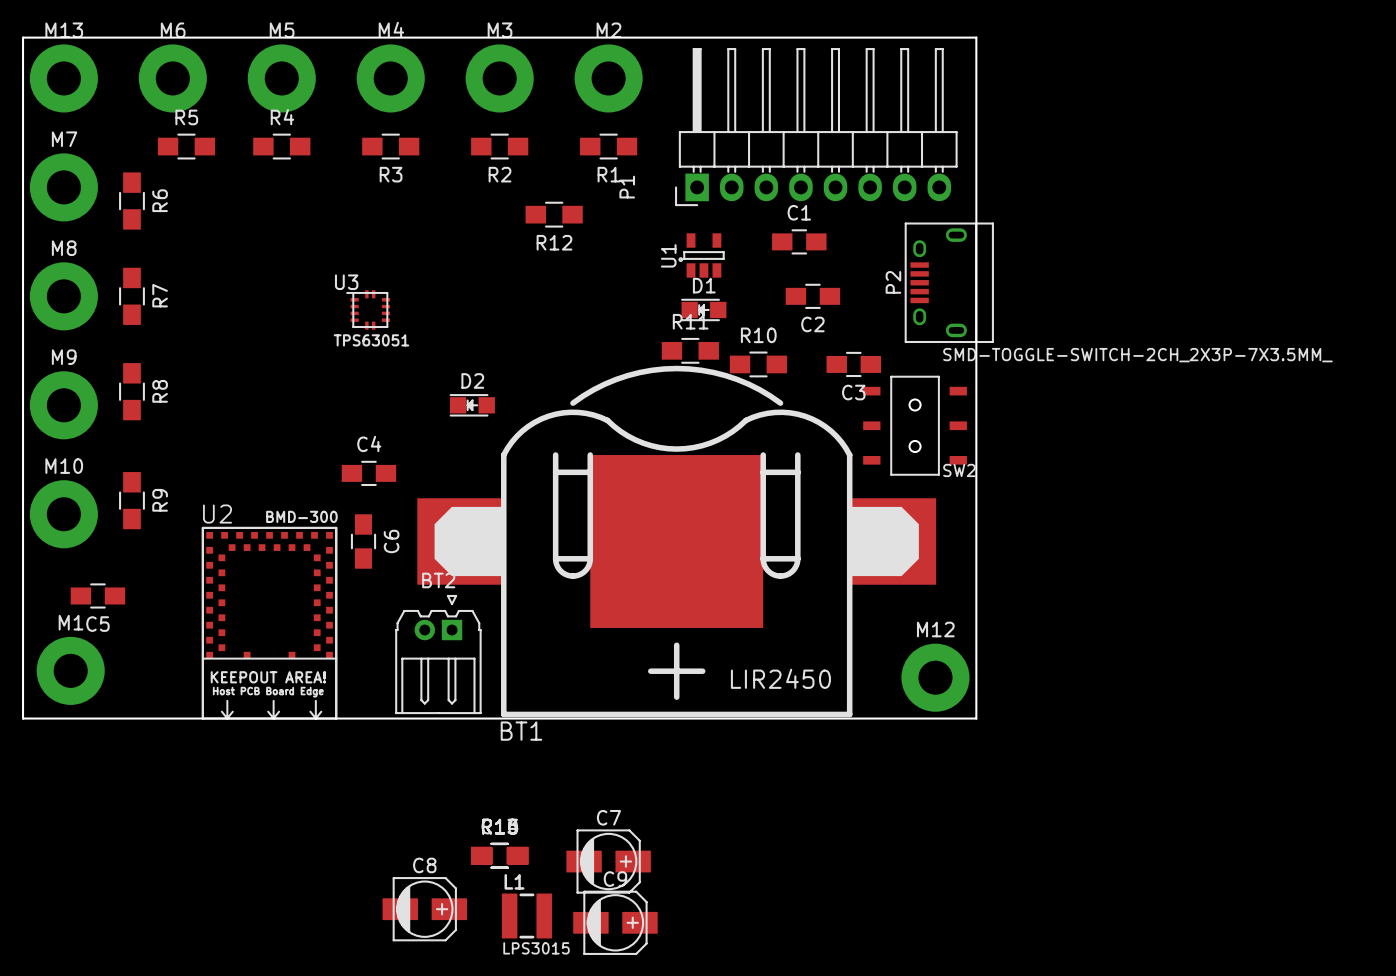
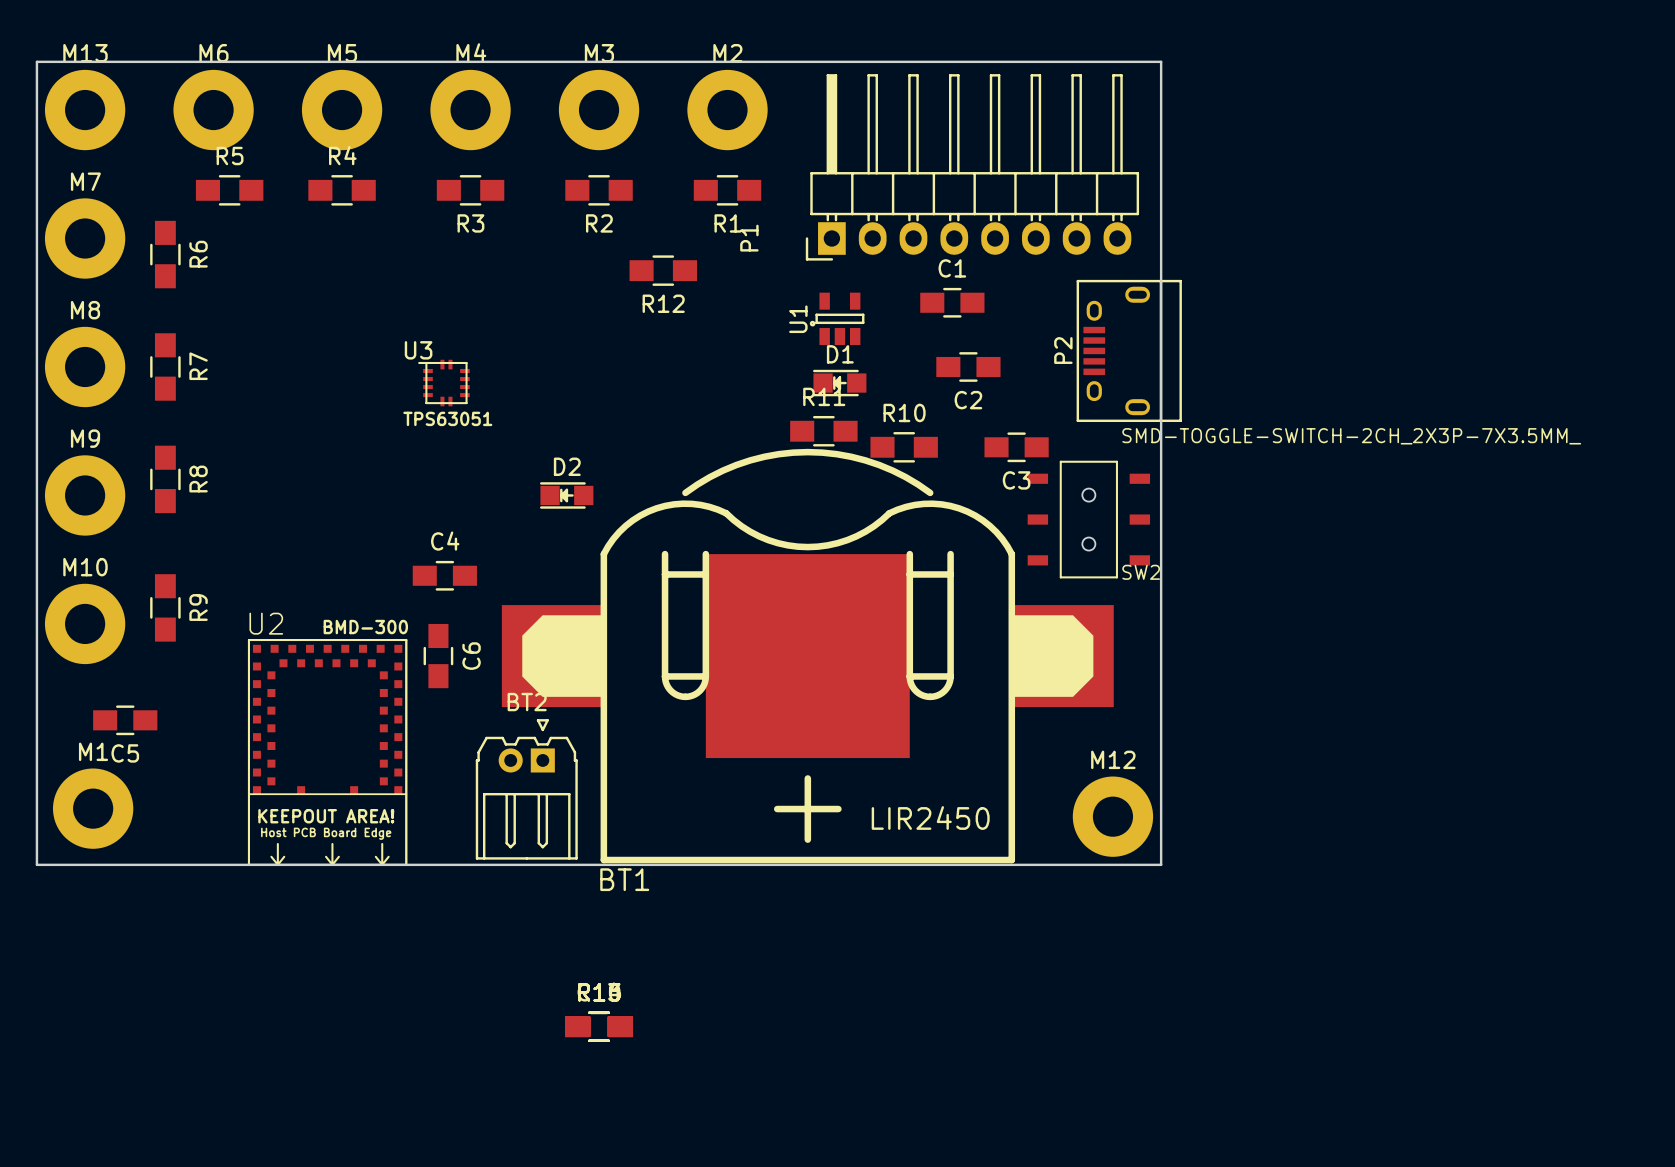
C7: (608, 861) -> none
C8: (424, 909) -> none
L1: LPS3015 (526, 916) -> none
C9: (615, 922) -> none

